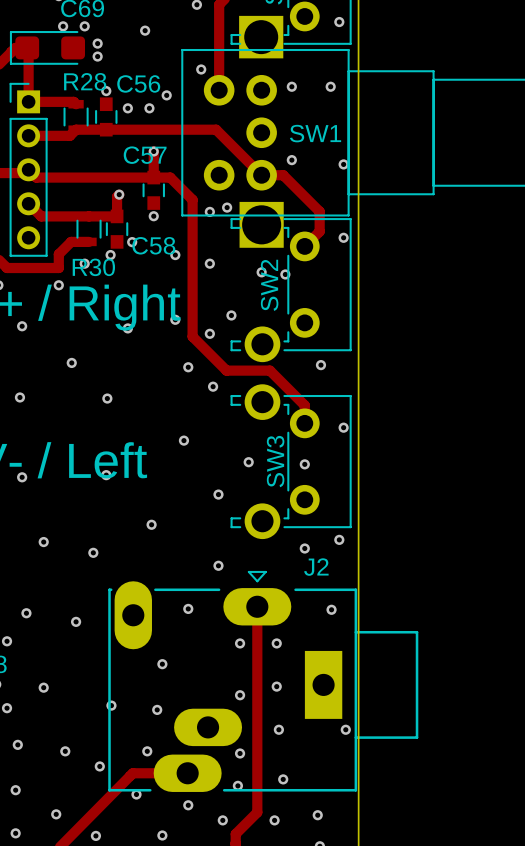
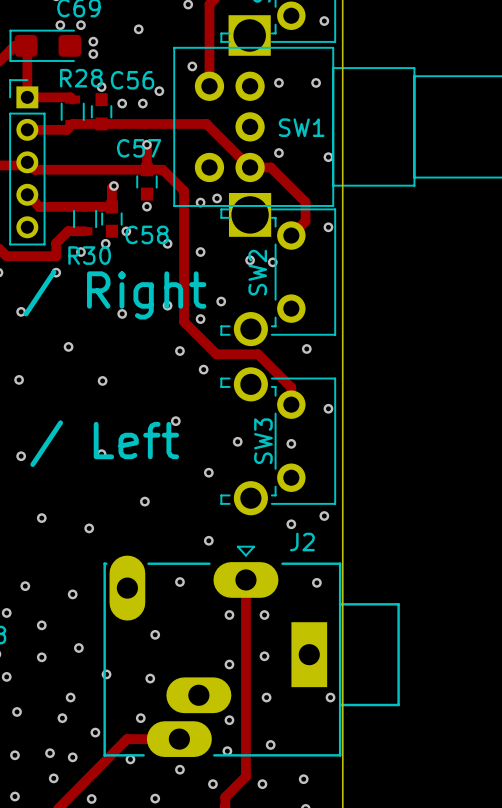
via: none -> (41, 625)
via: none -> (78, 648)
via: none -> (70, 697)
via: none -> (50, 753)
via: none -> (72, 757)

